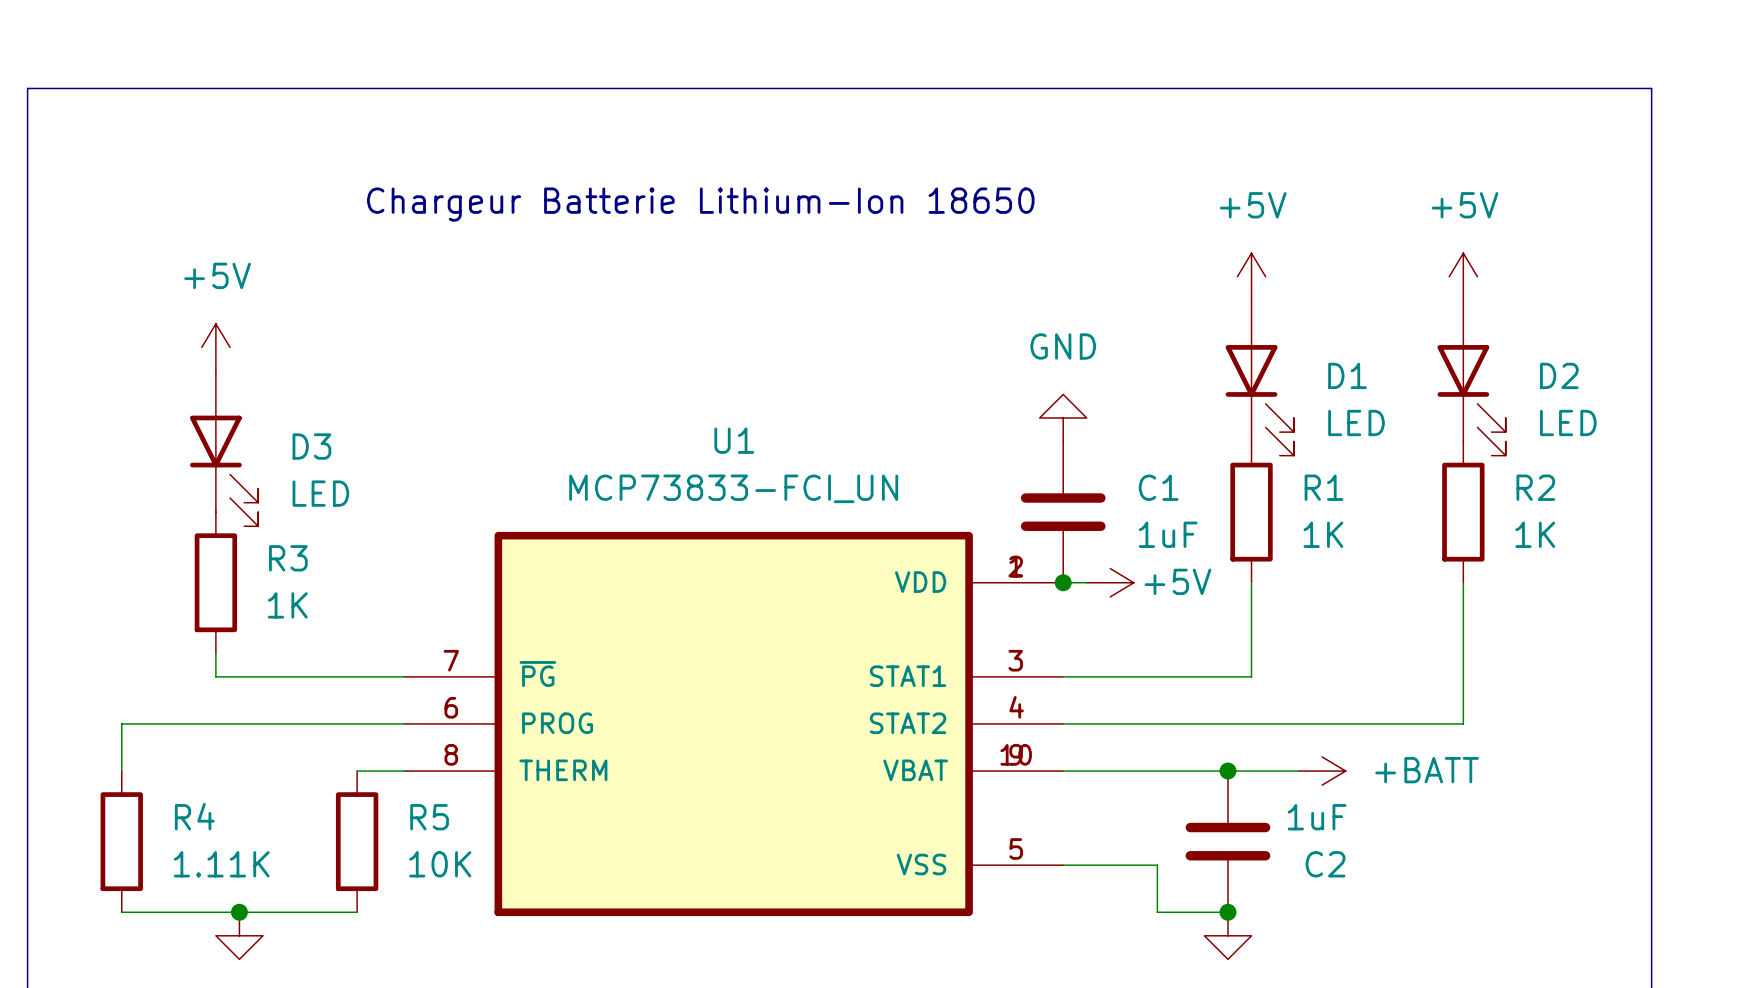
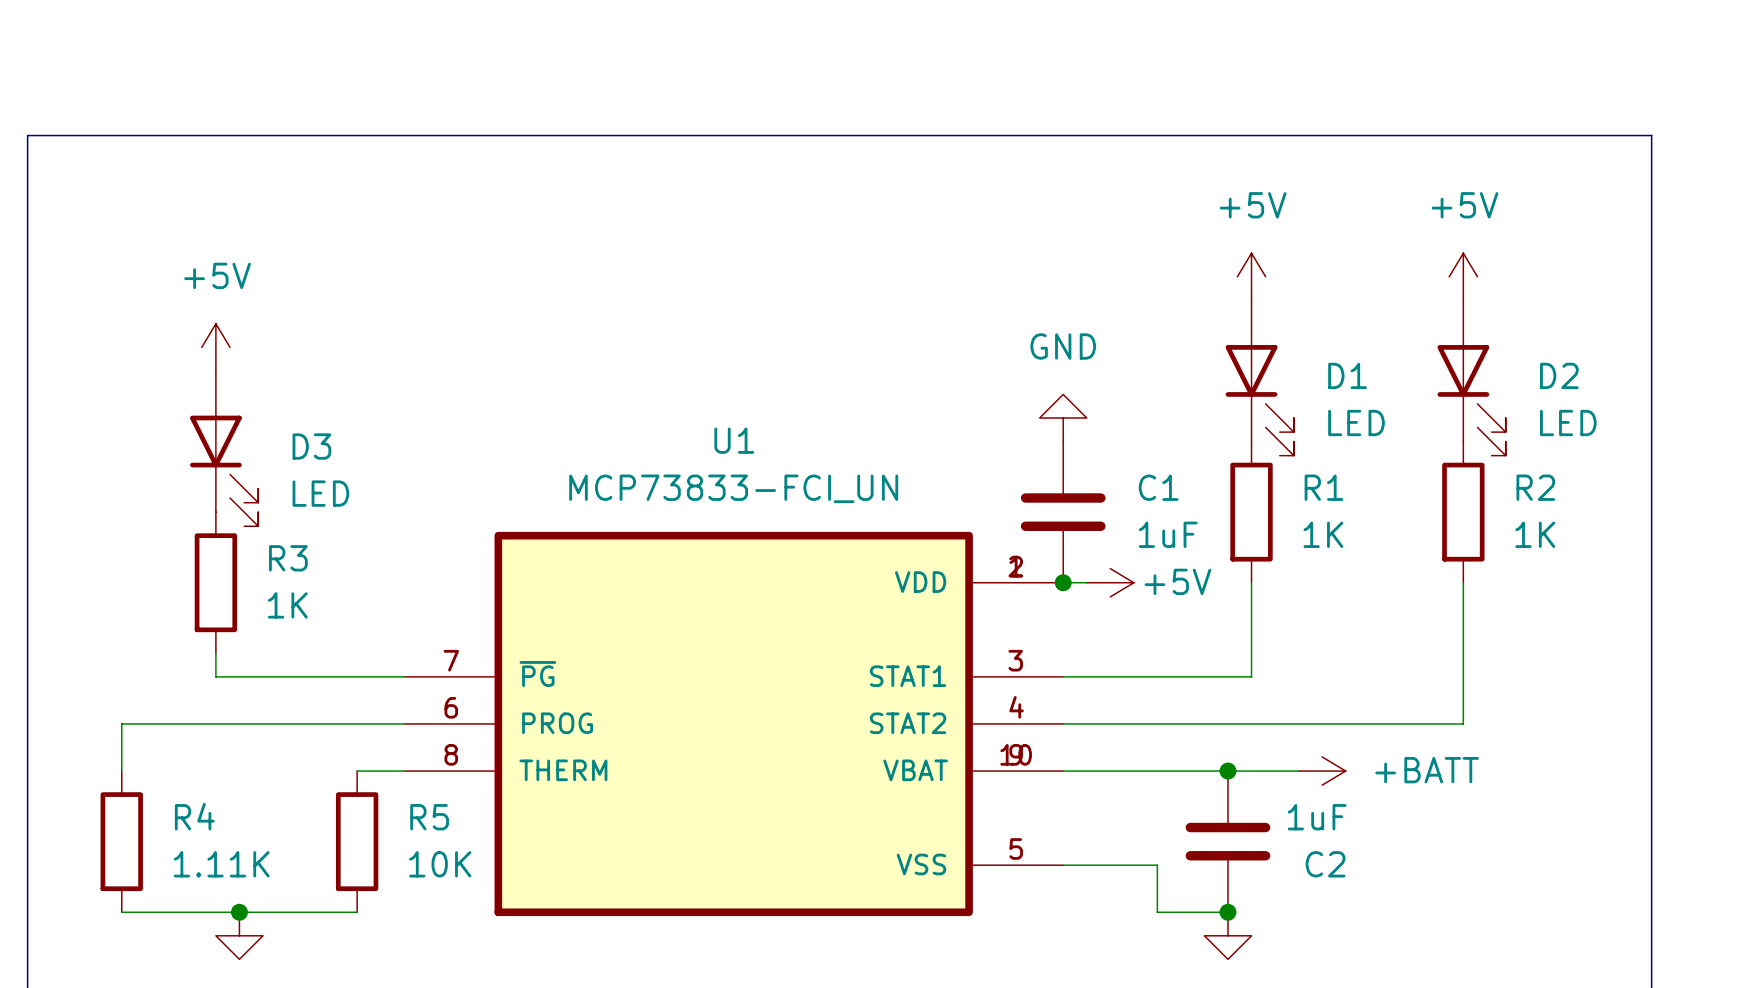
line: (27, 135) (27, 88) (1651, 88) (1651, 135) -> (27, 135) (1651, 135)
text: Chargeur Batterie Lithium-Ion 18650 (700, 204) -> none

